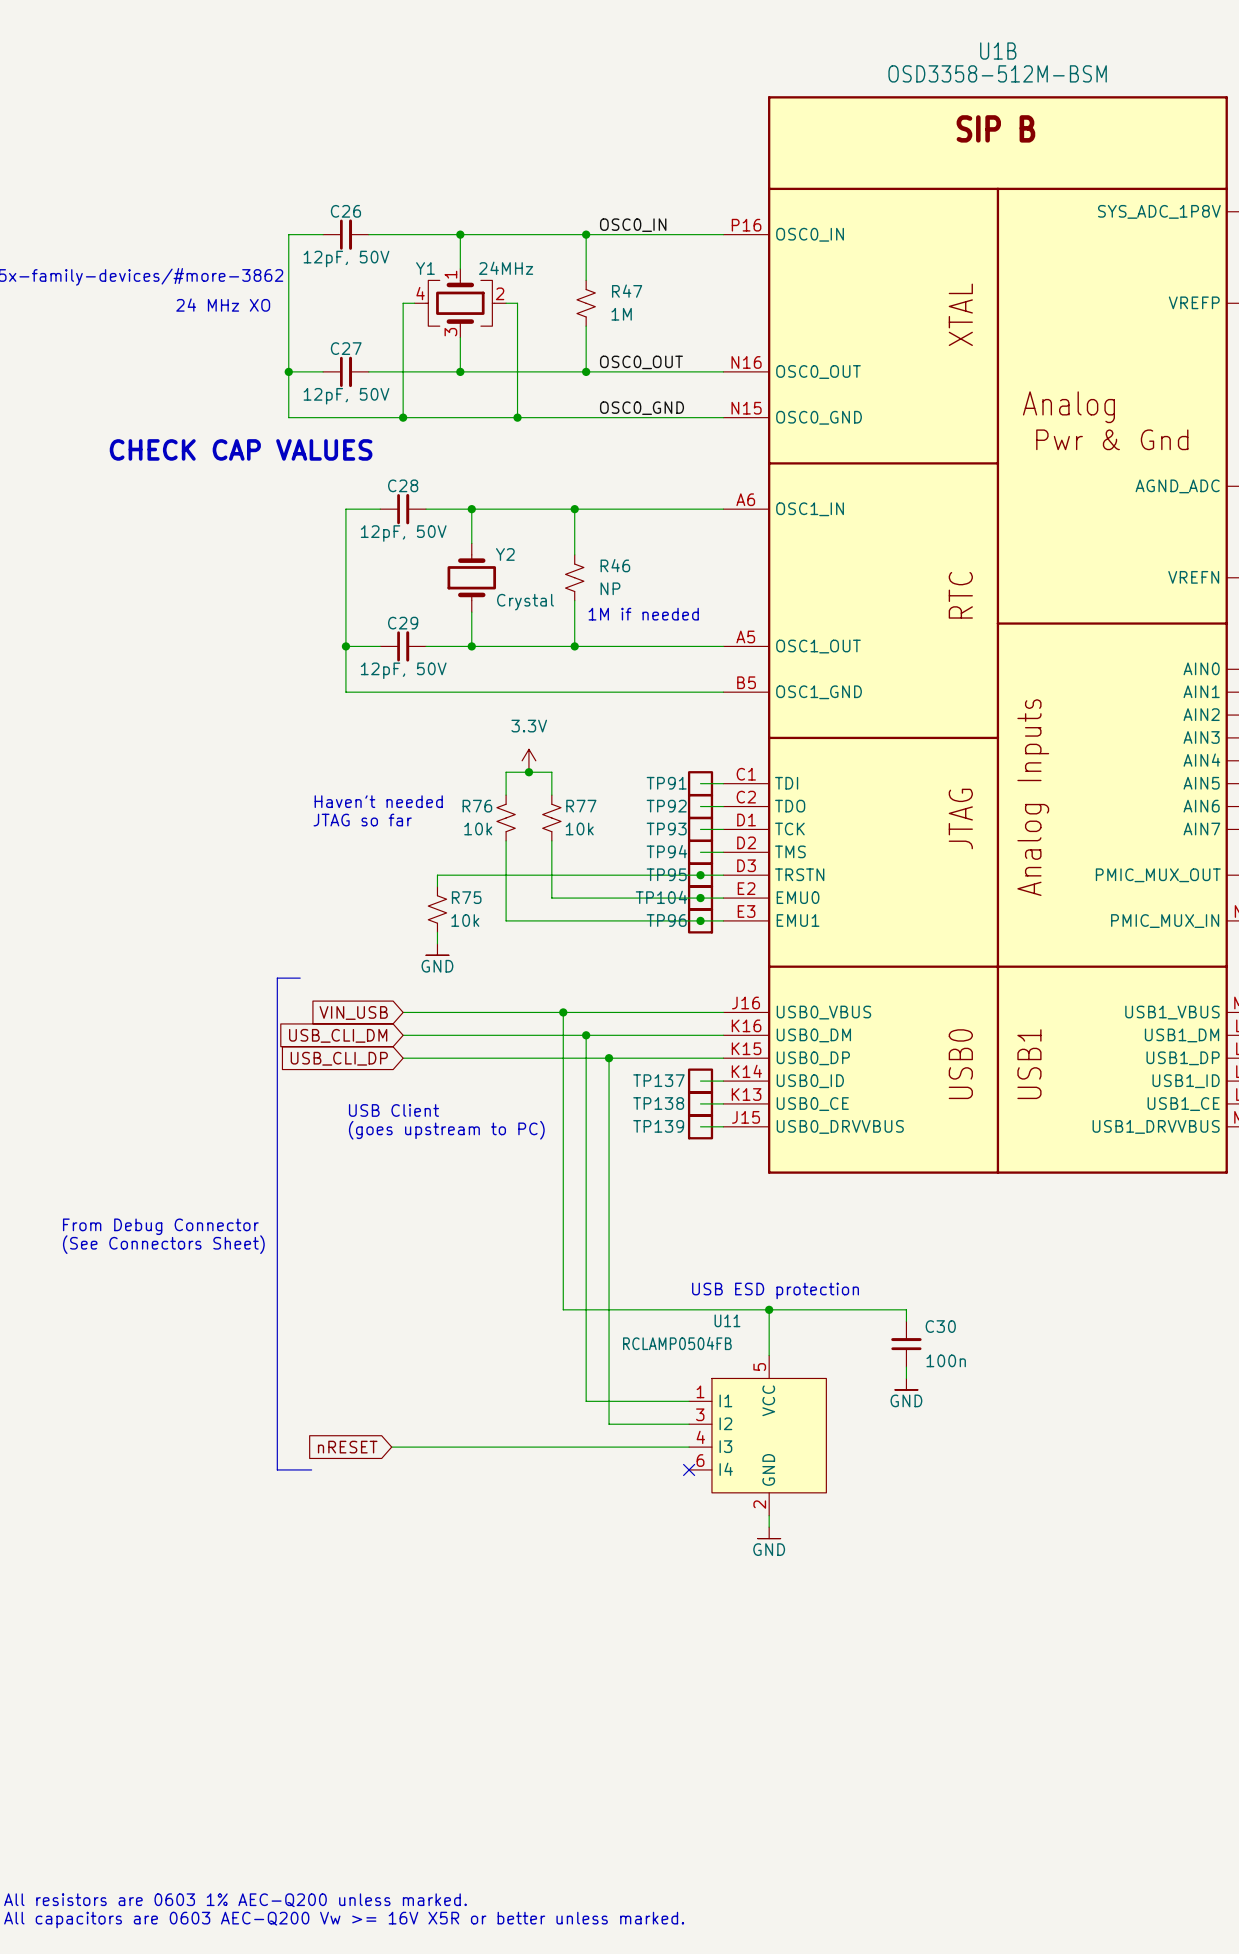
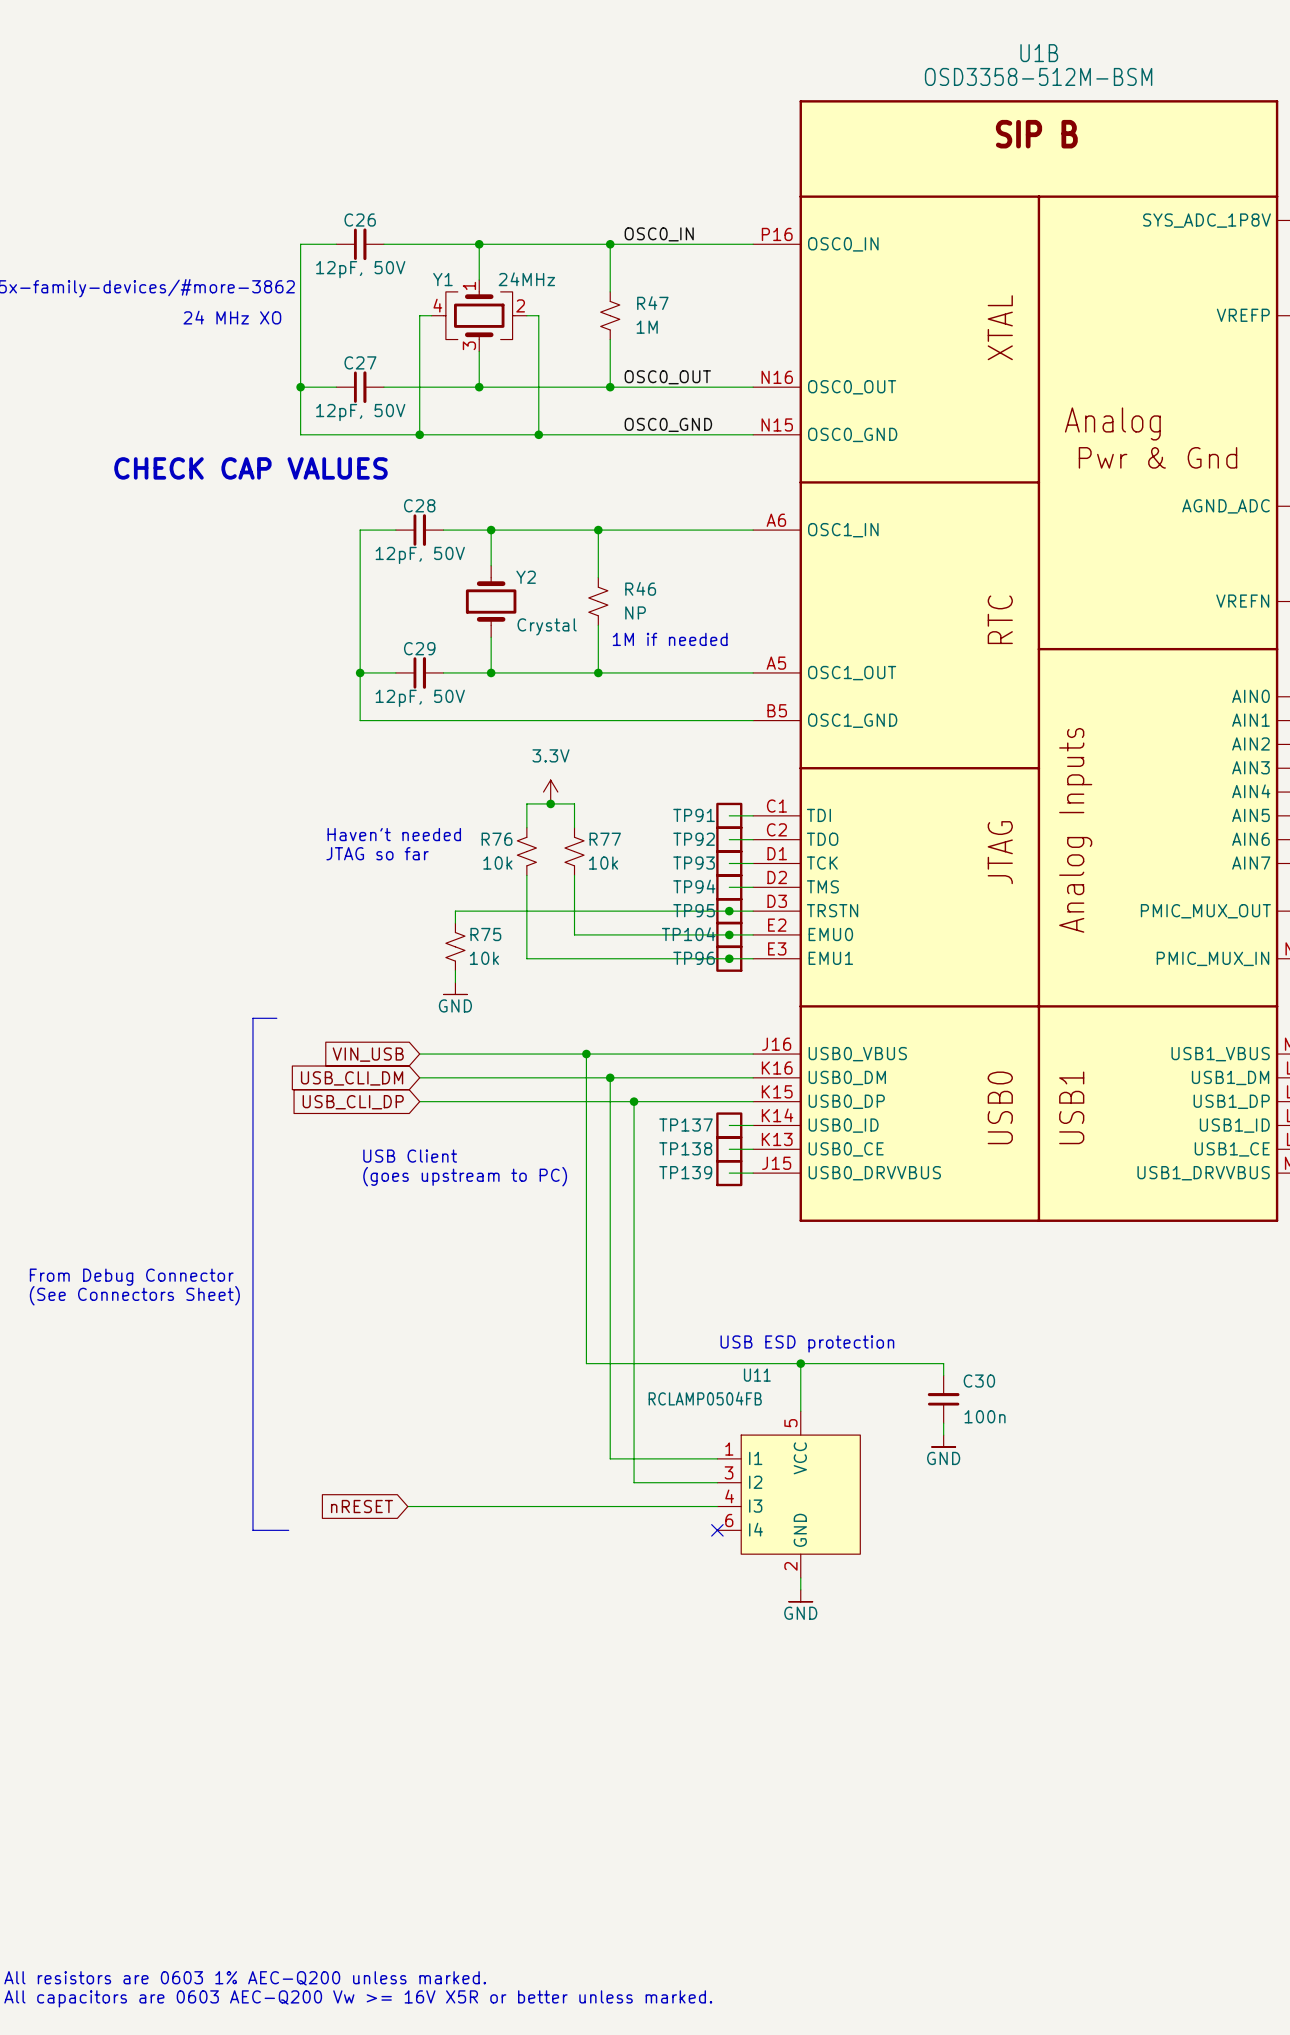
line: (300, 978) (277, 978) (277, 1469) (311, 1469) -> (276, 1018) (252, 1018) (252, 1530) (288, 1530)
text position: From Debug Connector (160, 1226) -> From Debug Connector (131, 1277)
text position: (See Connectors Sheet) (163, 1244) -> (See Connectors Sheet) (134, 1295)

